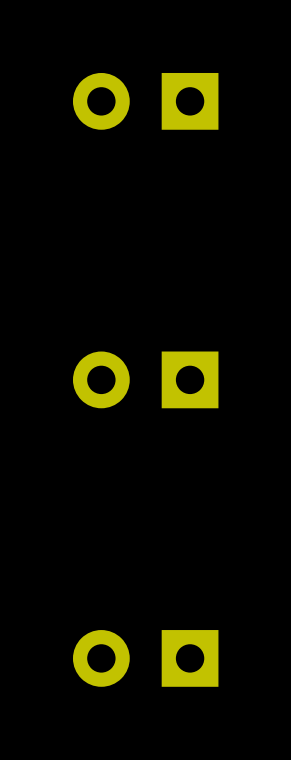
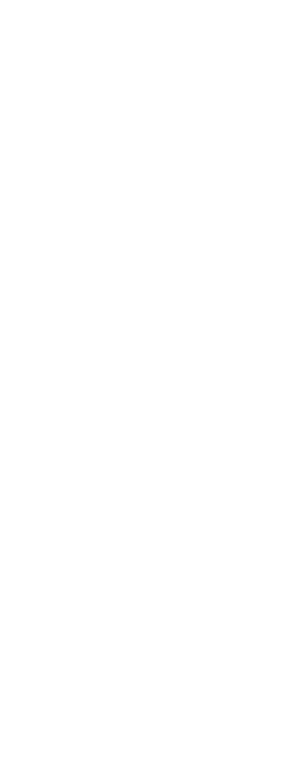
part: (145, 101) -> none
part: (145, 379) -> none
part: (145, 658) -> none

